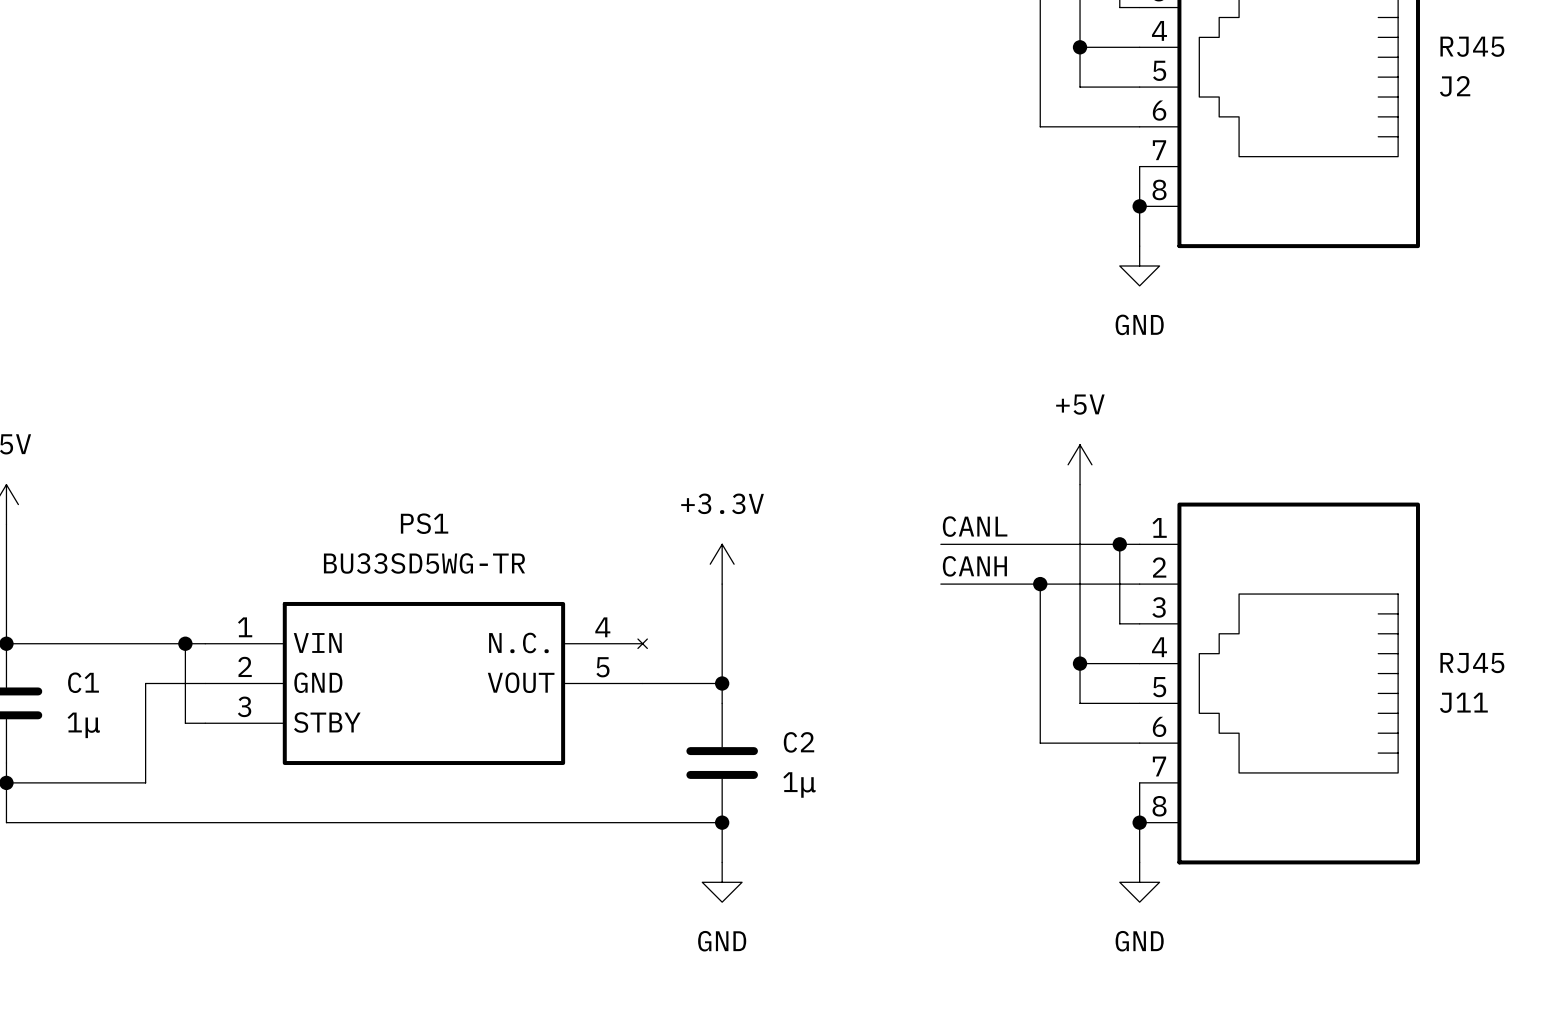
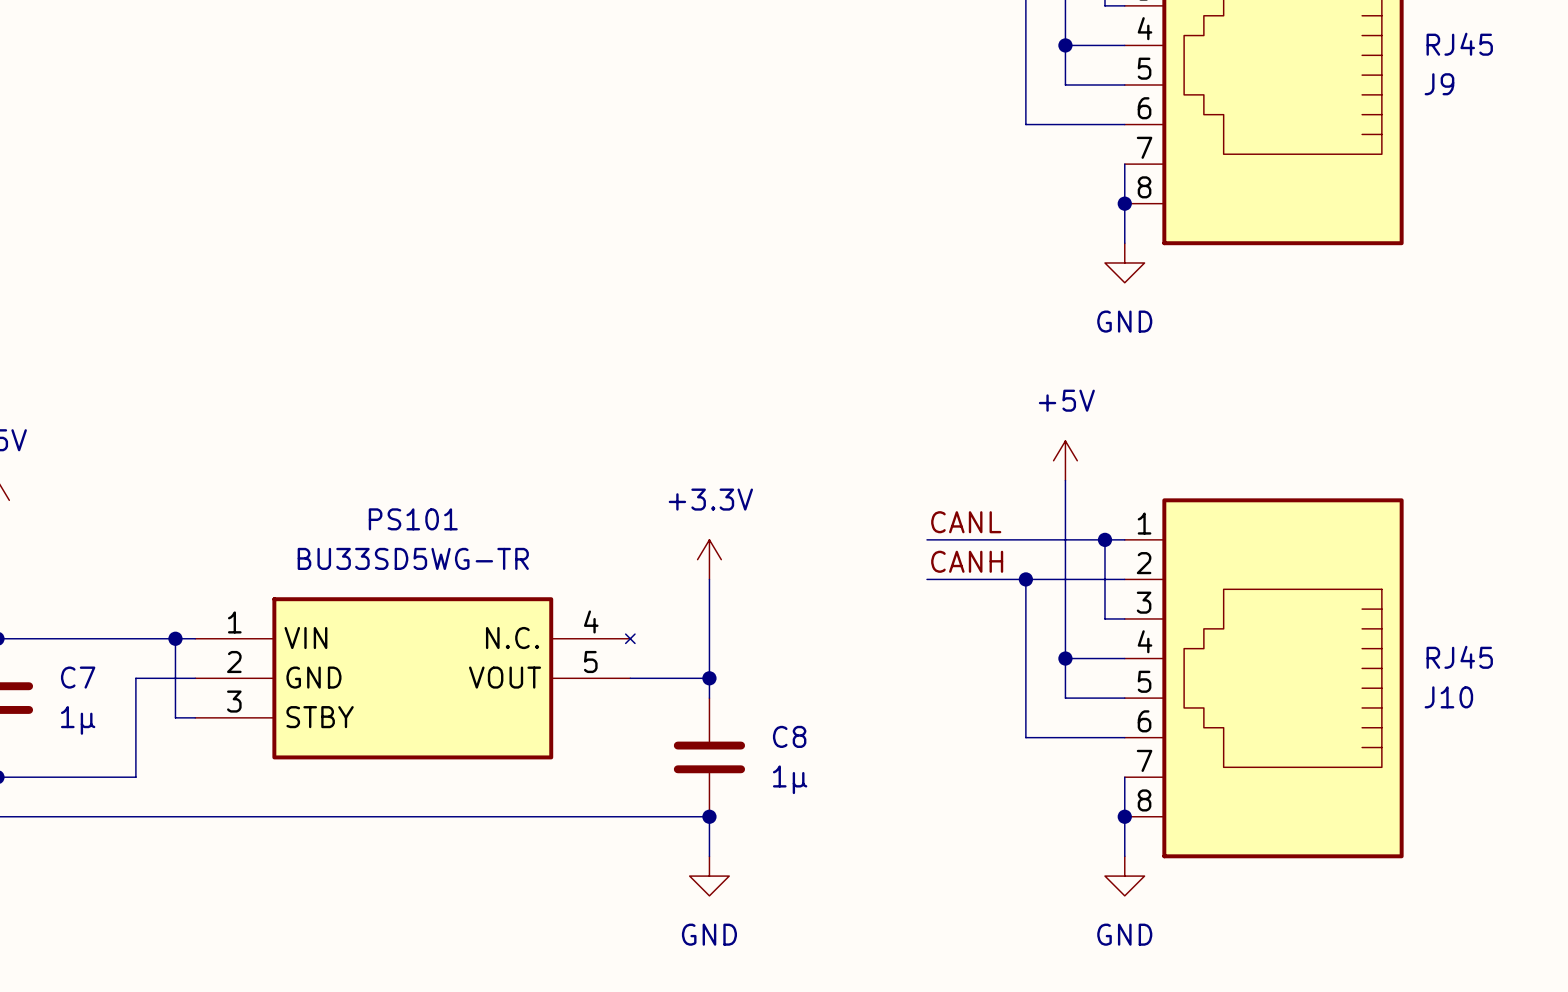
J2 name: J2 (1455, 86) -> J9 (1439, 84)
PS1 name: PS1 (424, 523) -> PS101 (413, 519)
C1 name: C1 (83, 682) -> C7 (78, 677)
J11 name: J11 (1463, 702) -> J10 (1448, 697)
C2 name: C2 (799, 742) -> C8 (789, 736)

